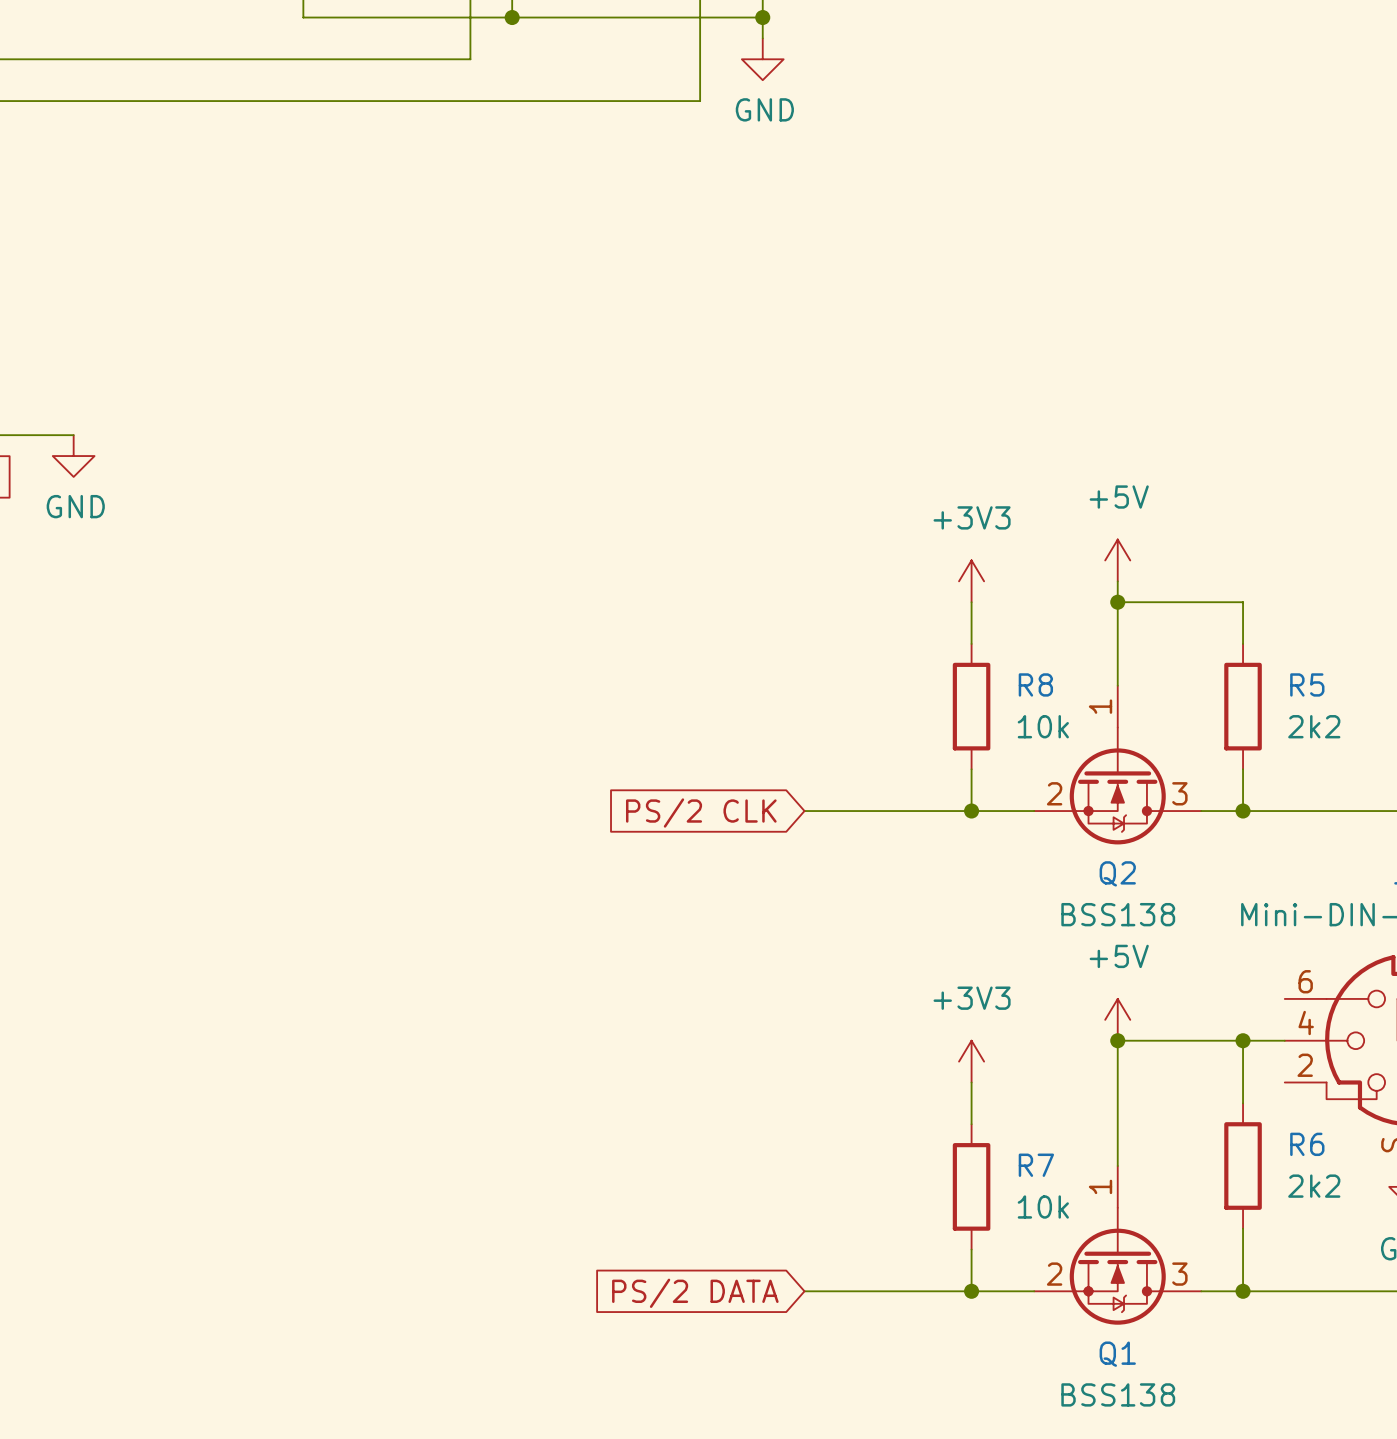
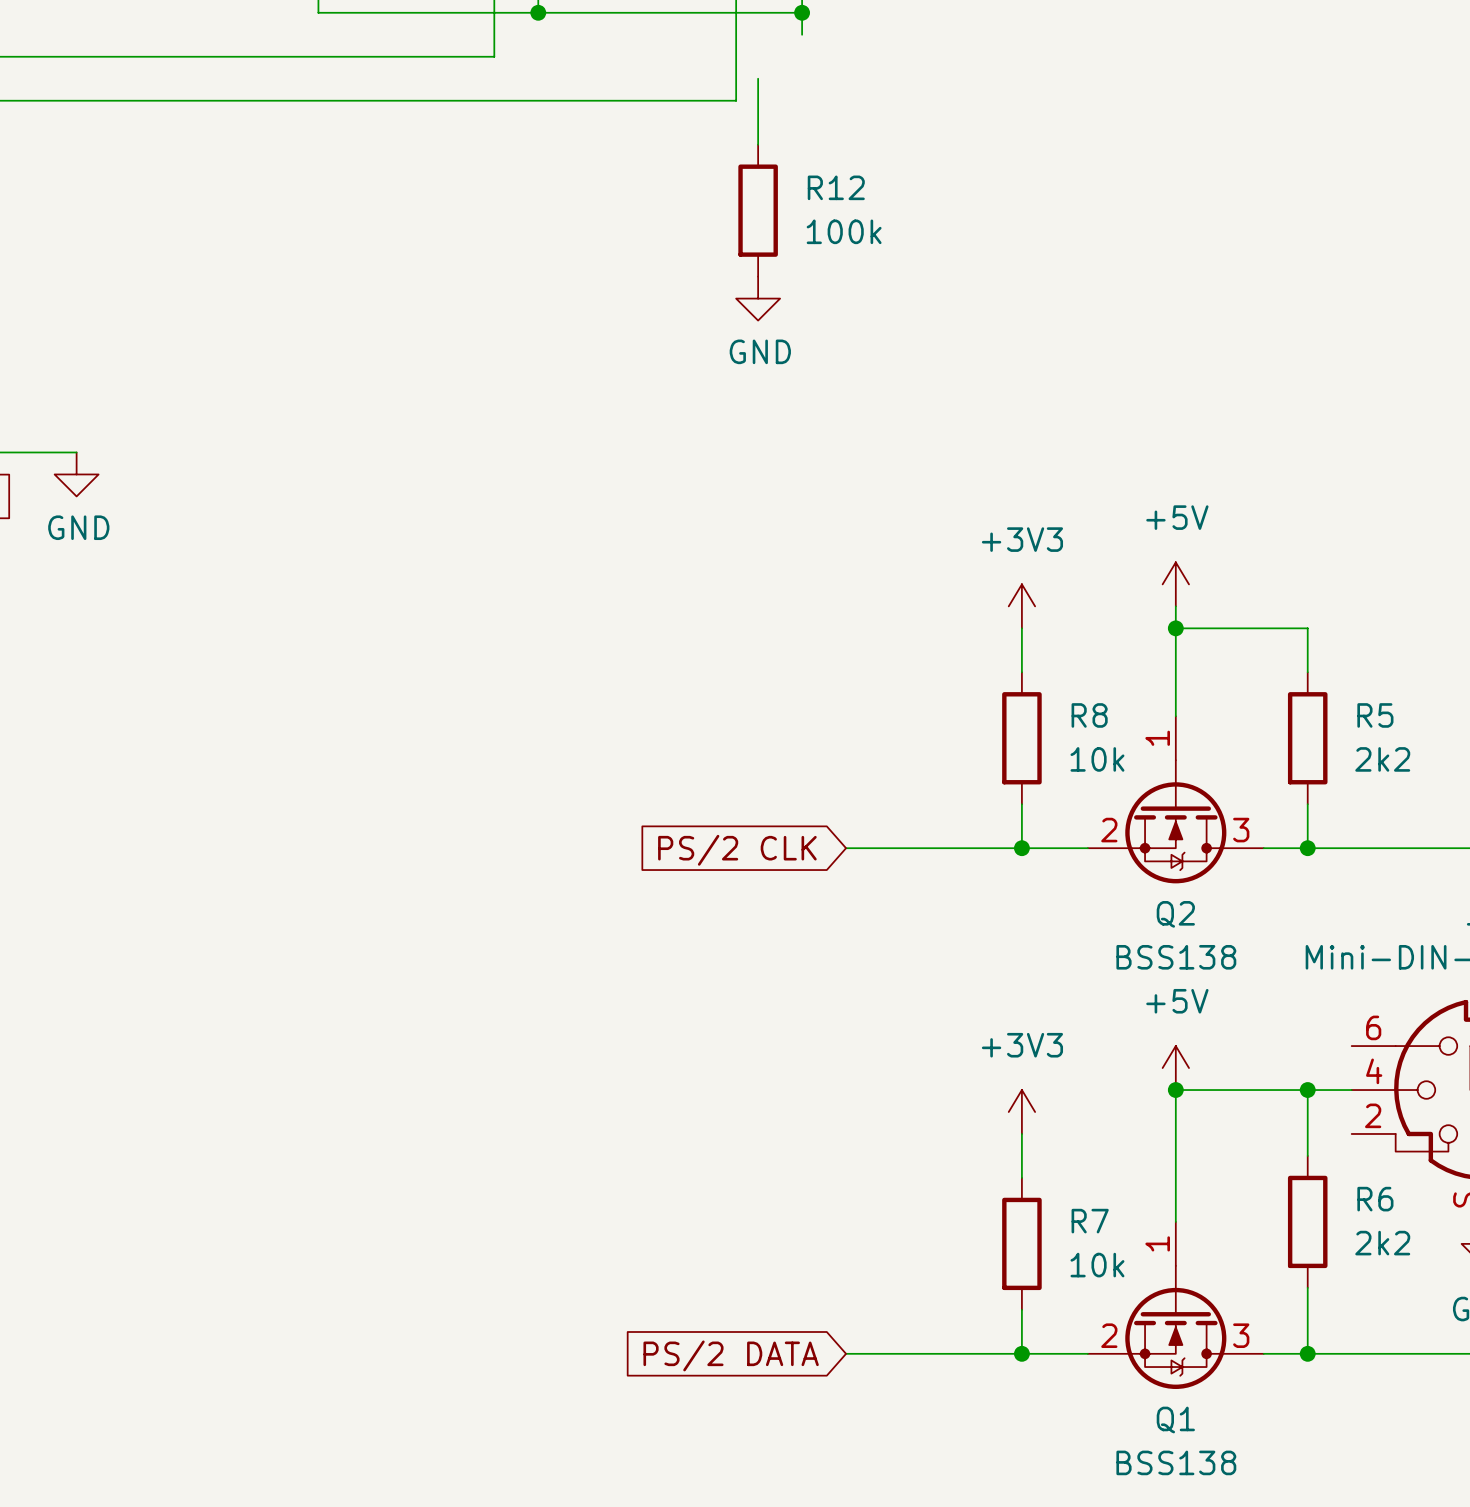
power symbol: GND (762, 59) -> none
wire: none -> (758, 78) (758, 144)
R12: none -> 100k (758, 210)
power symbol: none -> GND (758, 298)

